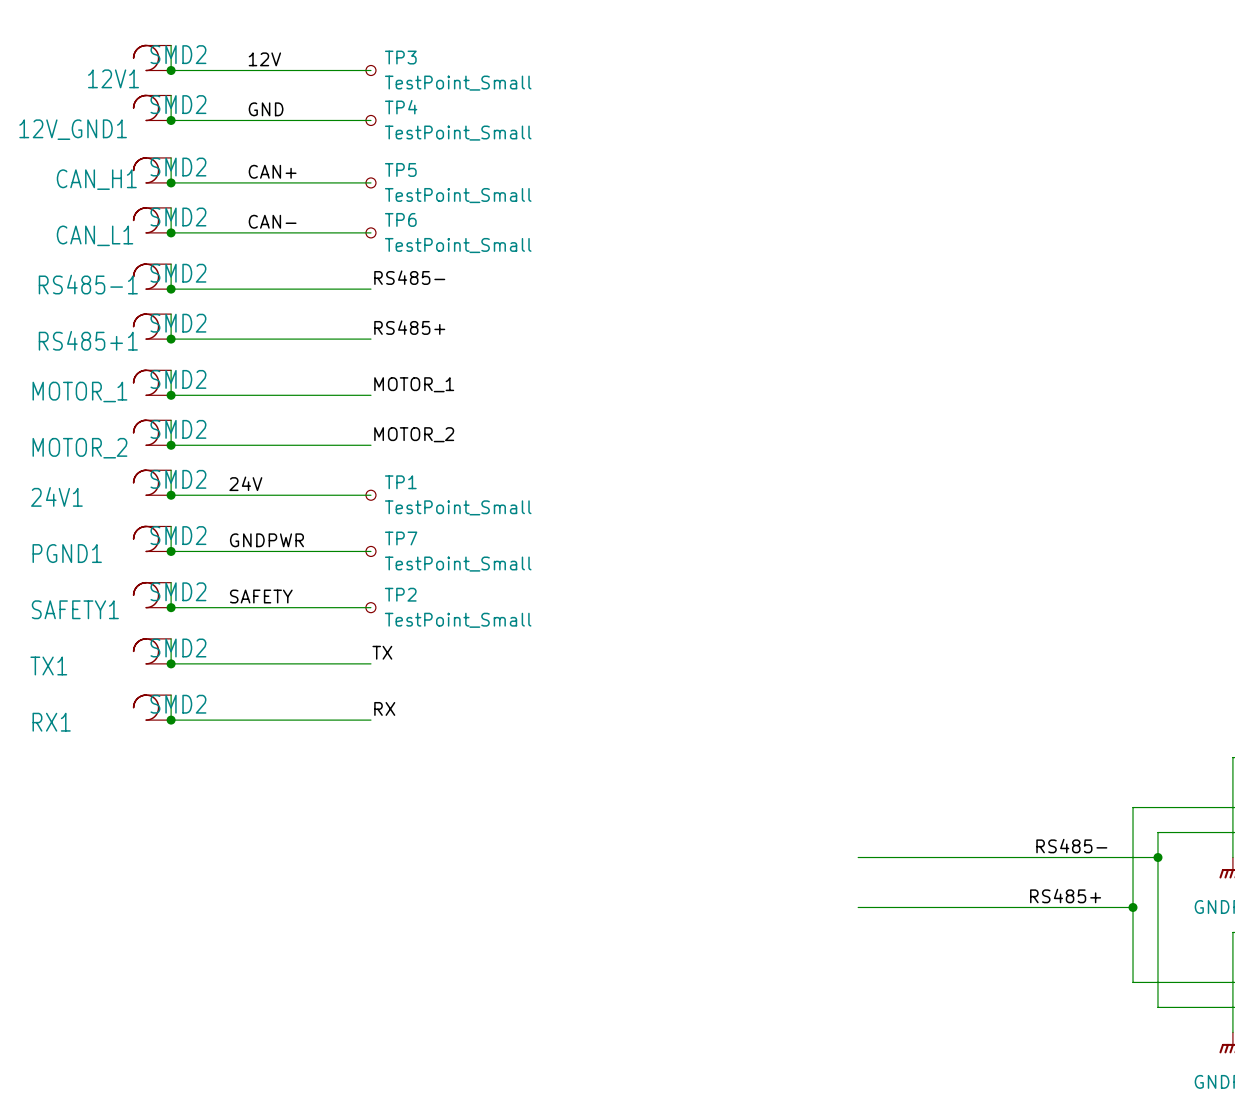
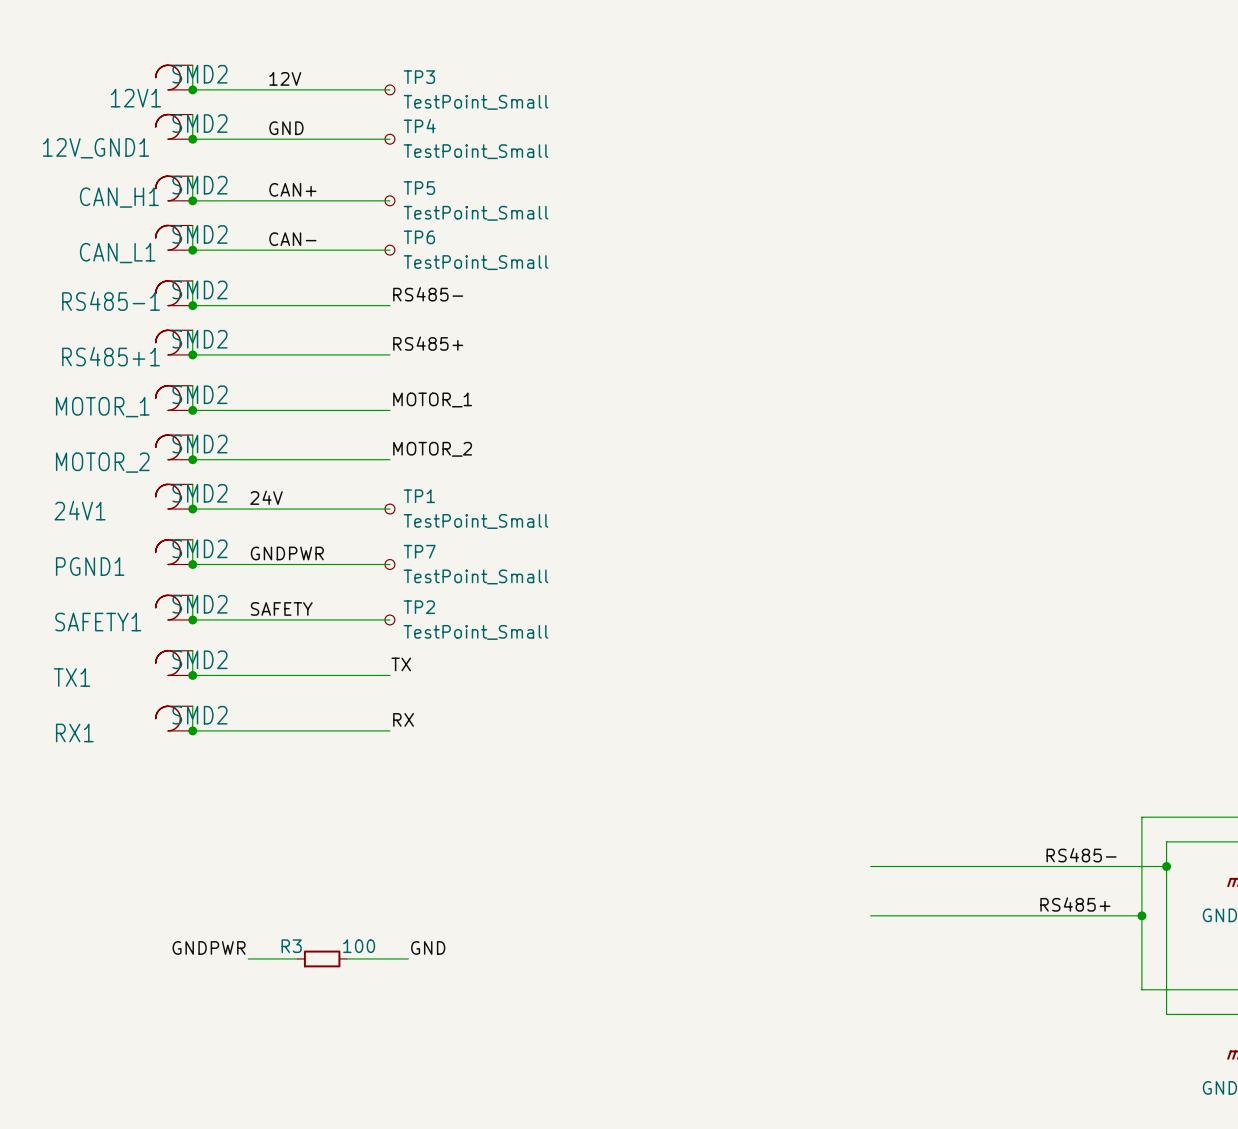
label: none -> GNDPWR (209, 947)
label: none -> GND (428, 947)
wire: none -> (248, 958) (297, 958)
R3: none -> 100 (322, 958)
wire: none -> (346, 958) (408, 958)

